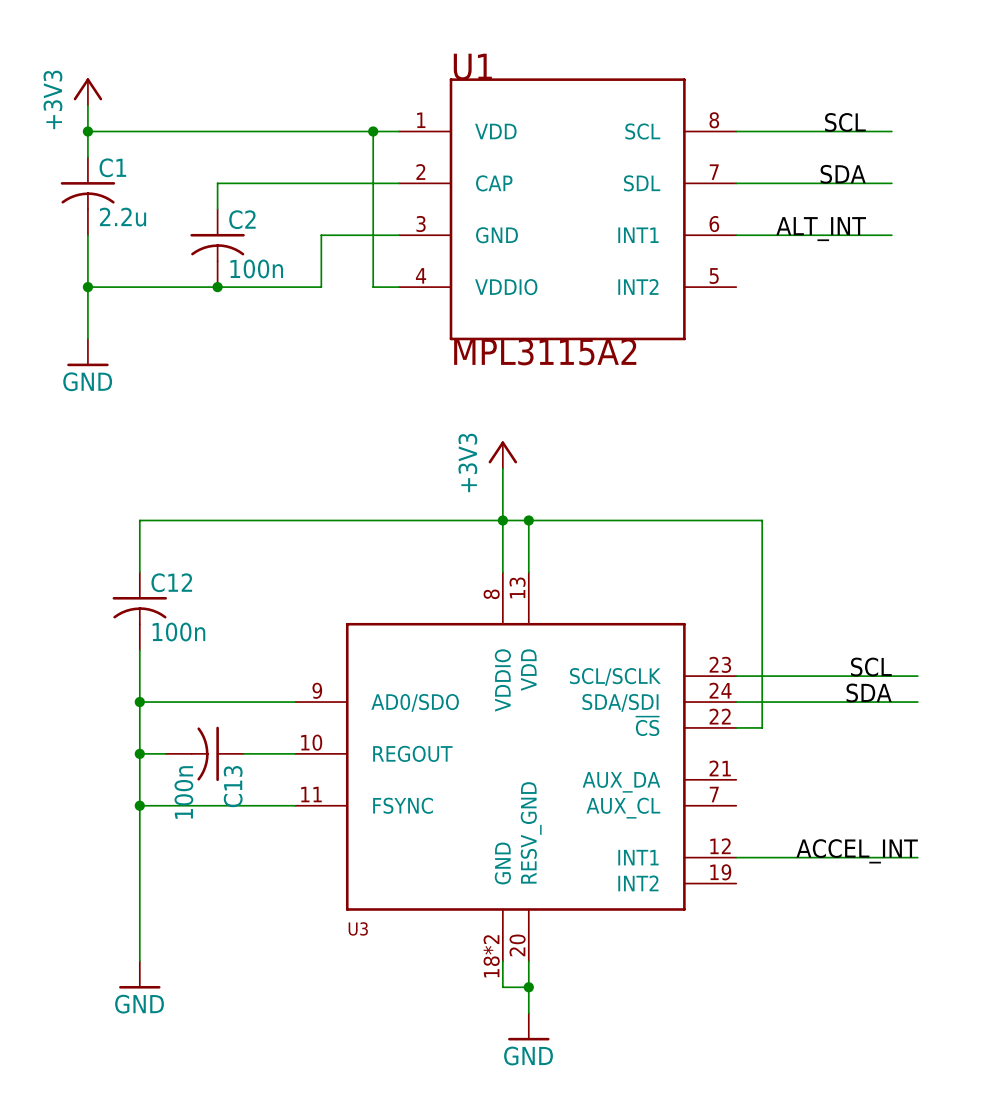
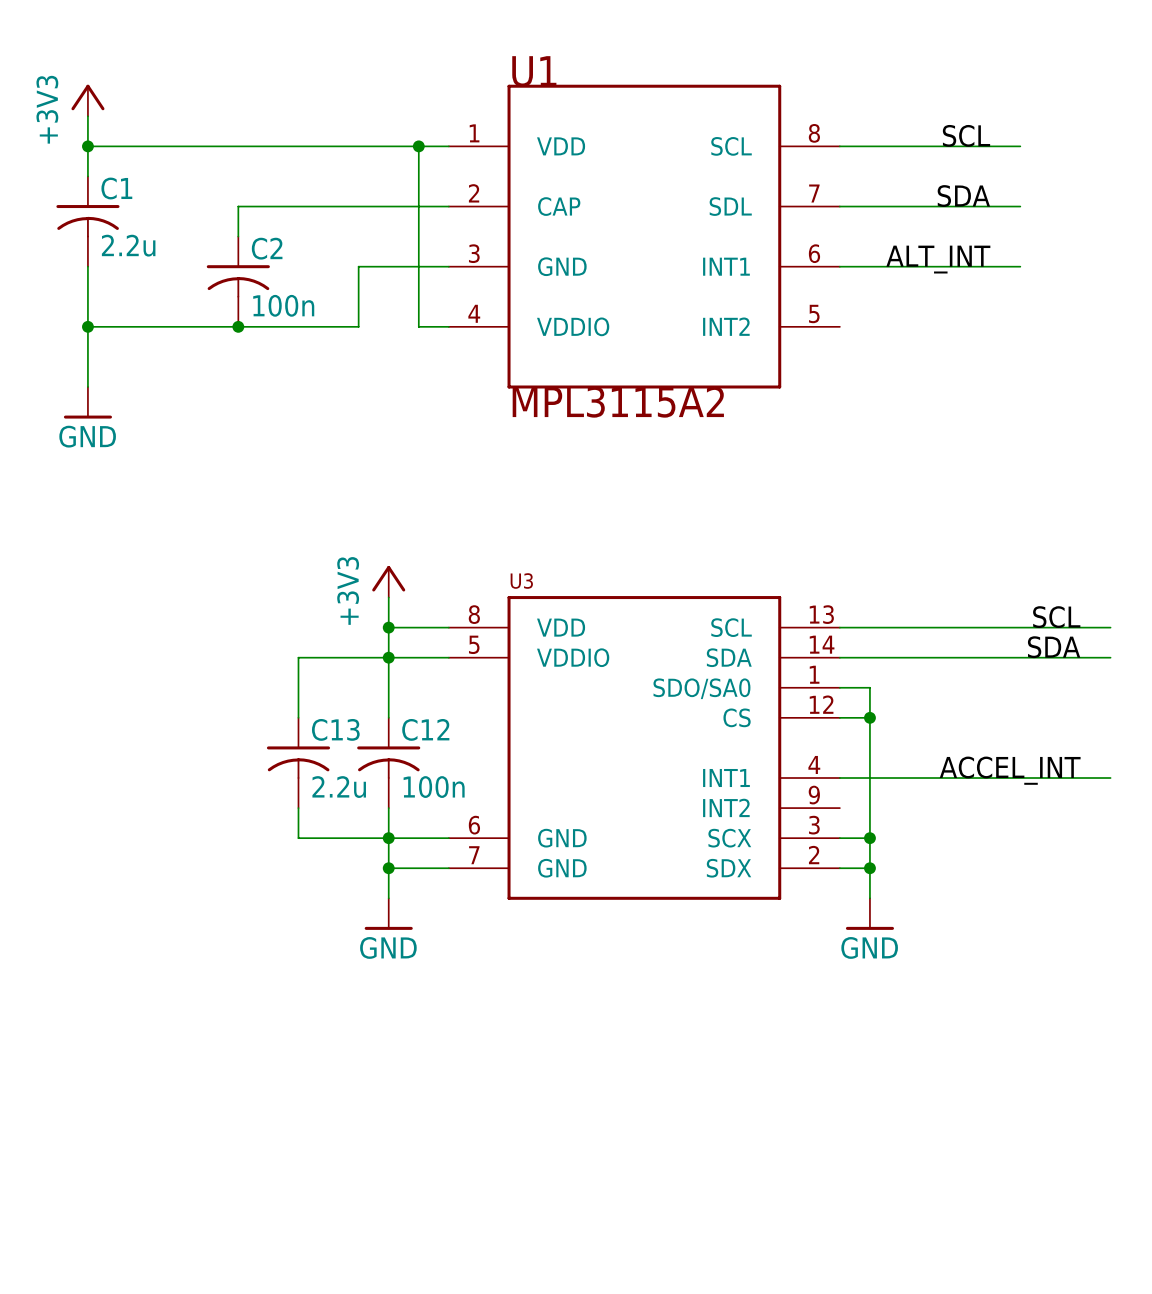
power symbol position: +3V3 (502, 455) -> +3V3 (388, 581)
wire: (502, 468) (502, 572) -> (388, 597) (388, 717)
junction: (502, 520) -> none
wire: (528, 520) (528, 572) -> none
junction: (528, 520) -> none
wire: none -> (388, 627) (448, 627)
junction: none -> (388, 627)
wire: none -> (839, 627) (1110, 627)
wire: (139, 572) (139, 520) (762, 520) (762, 598) -> (839, 687) (869, 687)
U3 symbol: [295, 572, 737, 962] -> [448, 596, 840, 900]
junction: none -> (388, 657)
wire: none -> (448, 657) (298, 657) (298, 717)
wire: none -> (839, 657) (1110, 657)
C12 position: (139, 611) -> (388, 762)
wire: none -> (839, 717) (869, 717)
junction: none -> (869, 717)
wire: (139, 650) (139, 961) -> none
label position: SCL (871, 667) -> SCL (1056, 617)
wire: none -> (1050, 778) (1110, 778)
label position: SDA (869, 692) -> SDA (1054, 647)
wire: (139, 702) (295, 702) -> none
junction: (139, 702) -> none
wire: none -> (298, 808) (298, 838) (448, 838)
wire: (736, 702) (917, 702) -> none
junction: none -> (388, 838)
wire: none -> (869, 838) (869, 898)
junction: none -> (869, 838)
wire: (139, 753) (165, 753) -> none
junction: (139, 753) -> none
C13 rotation: 0° (204, 753) -> 90° counterclockwise (298, 762)
C13 position: (204, 753) -> (298, 762)
wire: (243, 753) (295, 753) -> (388, 868) (448, 868)
junction: none -> (388, 868)
wire: none -> (839, 868) (869, 868)
junction: none -> (869, 868)
C13 value: 100n (183, 792) -> 2.2u (339, 787)
power symbol: none -> GND (388, 914)
power symbol: none -> GND (869, 914)
wire: (139, 805) (295, 805) -> none
junction: (139, 805) -> none
label position: ACCEL_INT (857, 851) -> ACCEL_INT (1010, 770)
wire: (736, 857) (917, 857) -> none
U3 name position: U3 (358, 928) -> U3 (521, 581)
wire: (502, 961) (502, 987) (528, 987) -> none
wire: (528, 961) (528, 1013) -> none
power symbol: GND (139, 974) -> none
junction: (528, 987) -> none
power symbol: GND (528, 1026) -> none

